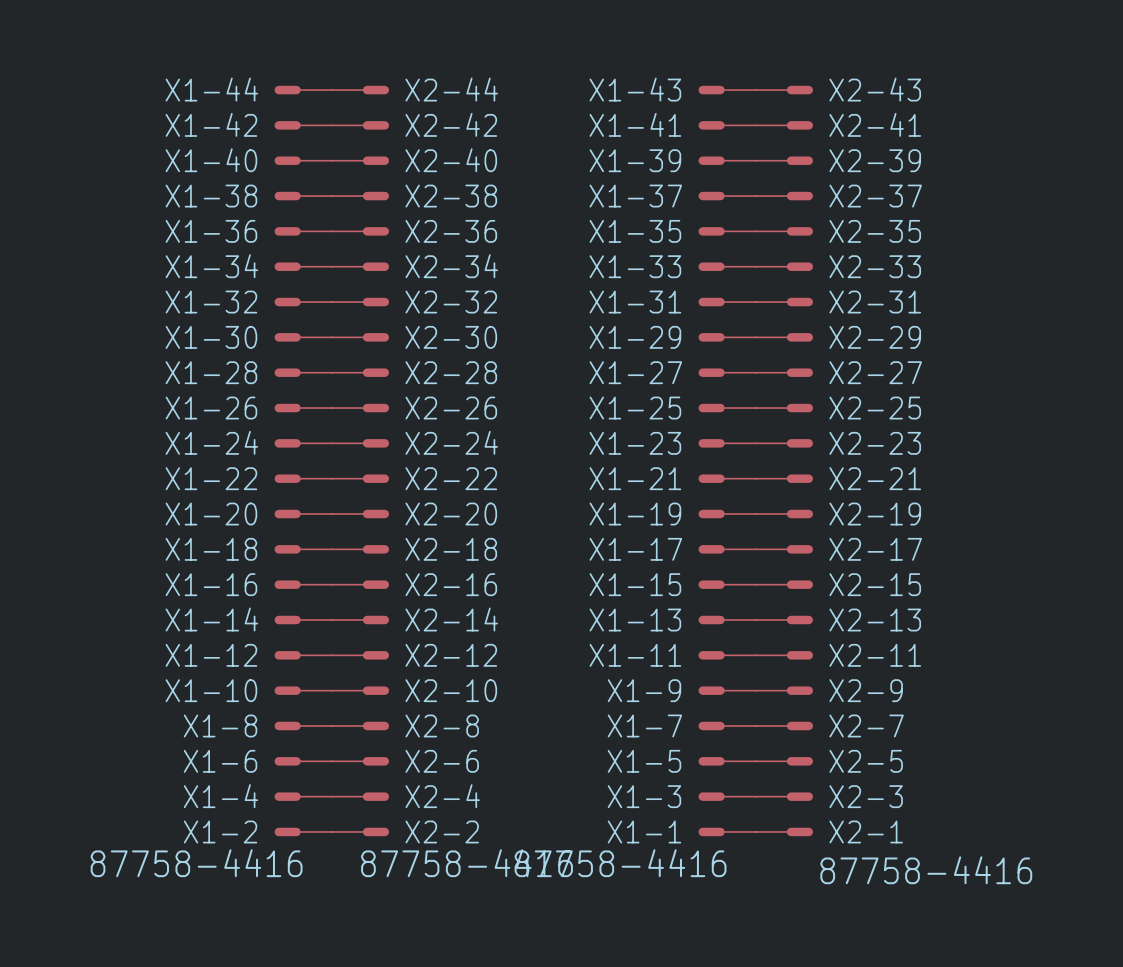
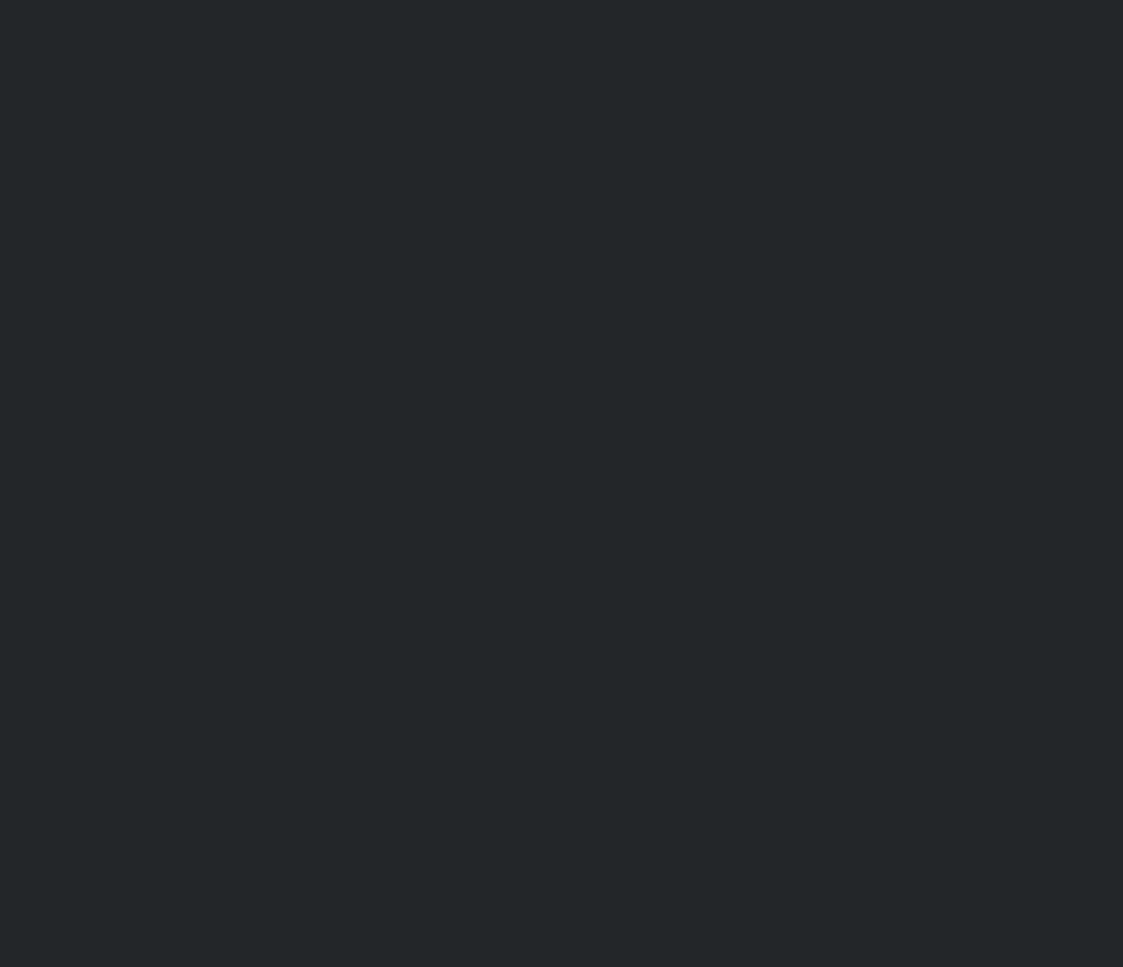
X1-44: (303, 90) -> none
X2-44: (360, 90) -> none
X1-43: (727, 90) -> none
X2-43: (784, 90) -> none
X1-42: (303, 125) -> none
X2-42: (360, 125) -> none
X1-41: (727, 125) -> none
X2-41: (784, 125) -> none
X1-40: (303, 160) -> none
X2-40: (360, 160) -> none
X1-39: (727, 160) -> none
X2-39: (784, 160) -> none
X1-38: (303, 196) -> none
X2-38: (360, 196) -> none
X1-37: (727, 196) -> none
X2-37: (784, 196) -> none
X1-36: (303, 231) -> none
X2-36: (360, 231) -> none
X1-35: (727, 231) -> none
X2-35: (784, 231) -> none
X1-34: (303, 266) -> none
X2-34: (360, 266) -> none
X1-33: (727, 266) -> none
X2-33: (784, 266) -> none
X1-32: (303, 302) -> none
X2-32: (360, 302) -> none
X1-31: (727, 302) -> none
X2-31: (784, 302) -> none
X1-30: (303, 337) -> none
X2-30: (360, 337) -> none
X1-29: (727, 337) -> none
X2-29: (784, 337) -> none
X1-28: (303, 372) -> none
X2-28: (360, 372) -> none
X1-27: (727, 372) -> none
X2-27: (784, 372) -> none
X1-26: (303, 408) -> none
X2-26: (360, 408) -> none
X1-25: (727, 408) -> none
X2-25: (784, 408) -> none
X1-24: (303, 443) -> none
X2-24: (360, 443) -> none
X1-23: (727, 443) -> none
X2-23: (784, 443) -> none
X1-22: (303, 478) -> none
X2-22: (360, 478) -> none
X1-21: (727, 478) -> none
X2-21: (784, 478) -> none
X1-20: (303, 514) -> none
X2-20: (360, 514) -> none
X1-19: (727, 514) -> none
X2-19: (784, 514) -> none
X1-18: (303, 549) -> none
X2-18: (360, 549) -> none
X1-17: (727, 549) -> none
X2-17: (784, 549) -> none
X1-16: (303, 584) -> none
X2-16: (360, 584) -> none
X1-15: (727, 584) -> none
X2-15: (784, 584) -> none
X1-14: (303, 620) -> none
X2-14: (360, 620) -> none
X1-13: (727, 620) -> none
X2-13: (784, 620) -> none
X1-12: (303, 655) -> none
X2-12: (360, 655) -> none
X1-11: (727, 655) -> none
X2-11: (784, 655) -> none
X1-10: (303, 690) -> none
X2-10: (360, 690) -> none
X1-9: (727, 690) -> none
X2-9: (784, 690) -> none
X1-8: (303, 725) -> none
X2-8: (360, 725) -> none
X1-7: (727, 725) -> none
X2-7: (784, 725) -> none
X1-6: (303, 761) -> none
X2-6: (360, 761) -> none
X1-5: (727, 761) -> none
X2-5: (784, 761) -> none
X1-4: (303, 796) -> none
X2-4: (360, 796) -> none
X1-3: (727, 796) -> none
X2-3: (784, 796) -> none
X1-2: 87758-4416 (303, 831) -> none
X2-2: 87758-4416 (360, 831) -> none
X1-1: 87758-4416 (727, 831) -> none
X2-1: 87758-4416 (784, 831) -> none

